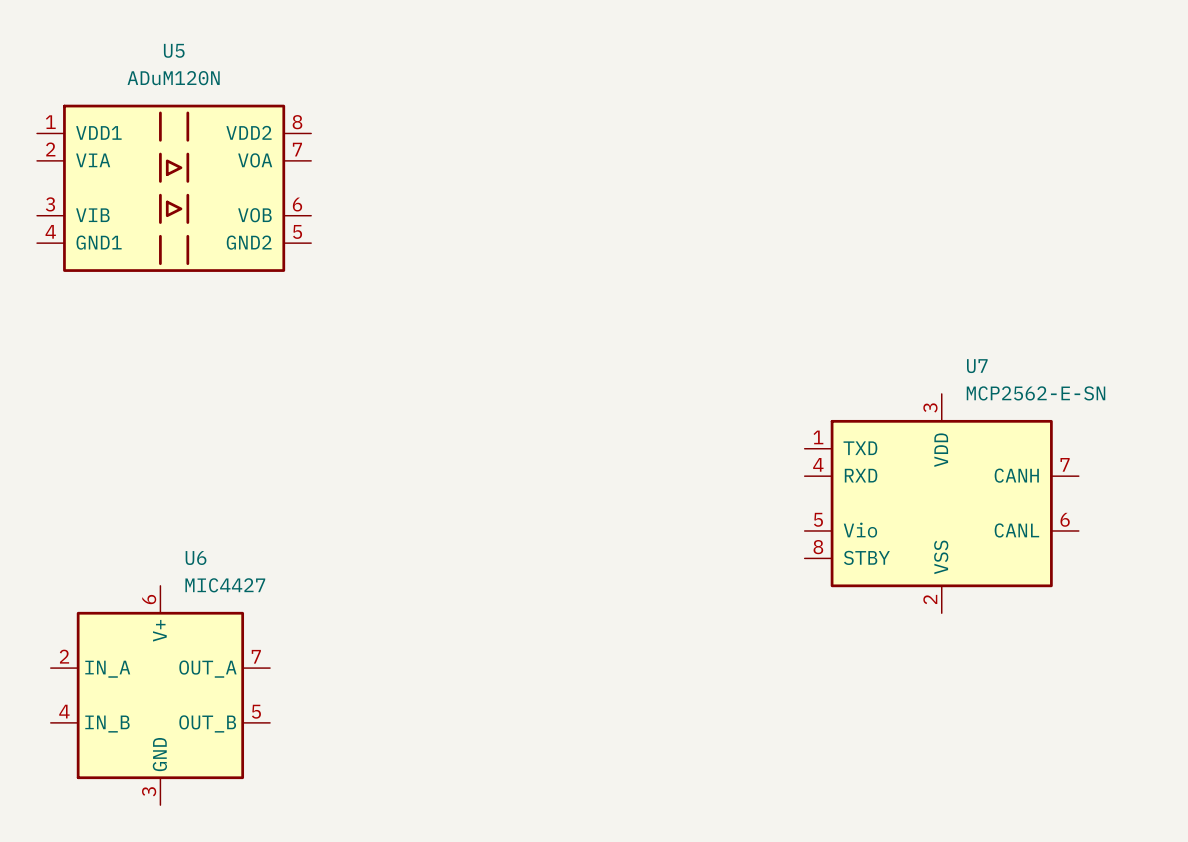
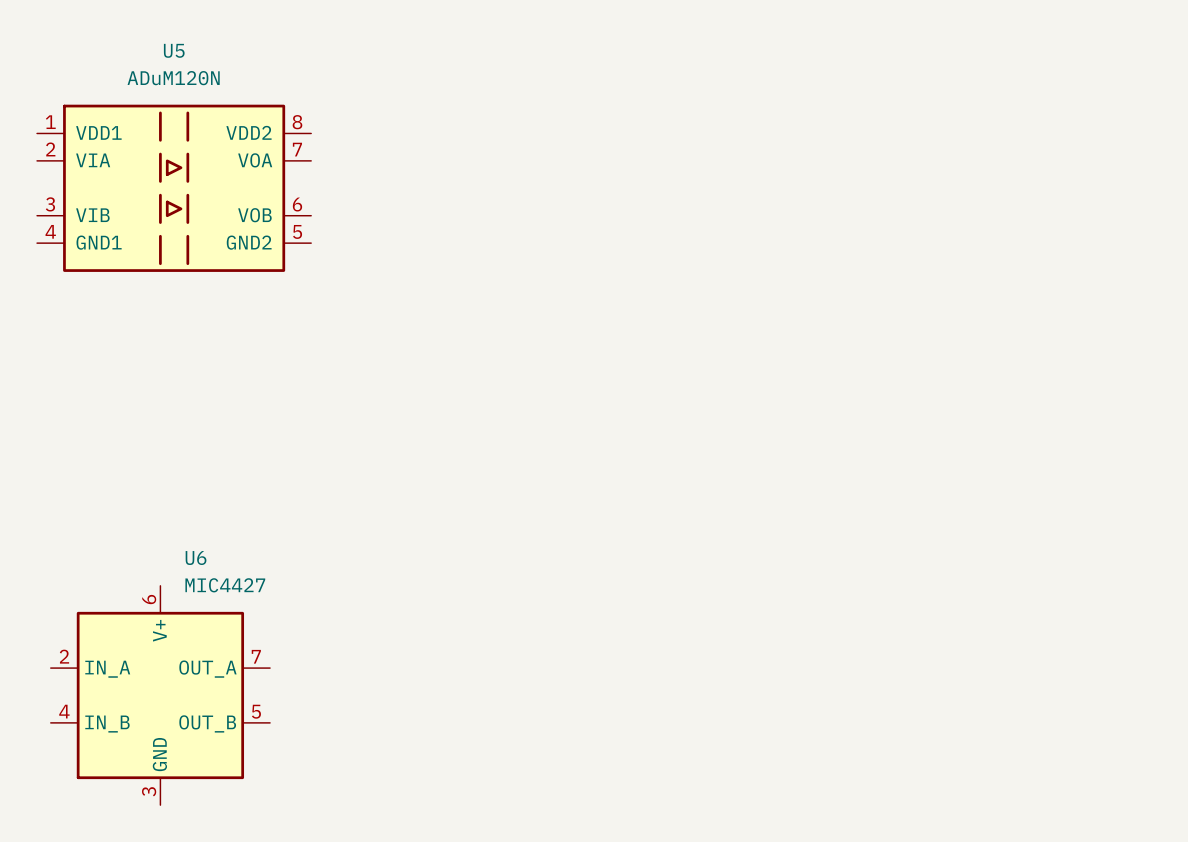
U7: MCP2562-E-SN (941, 503) -> none

